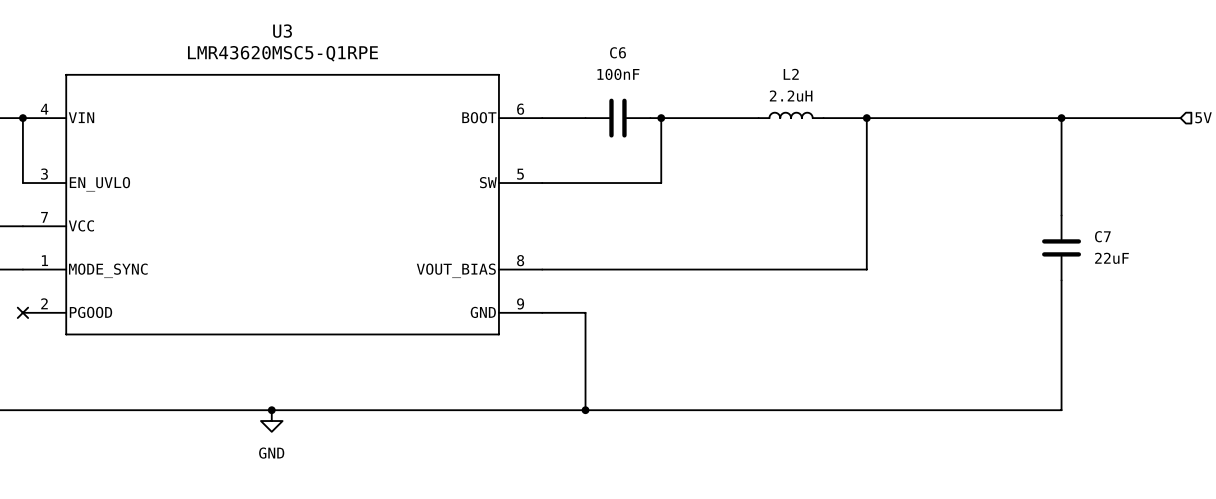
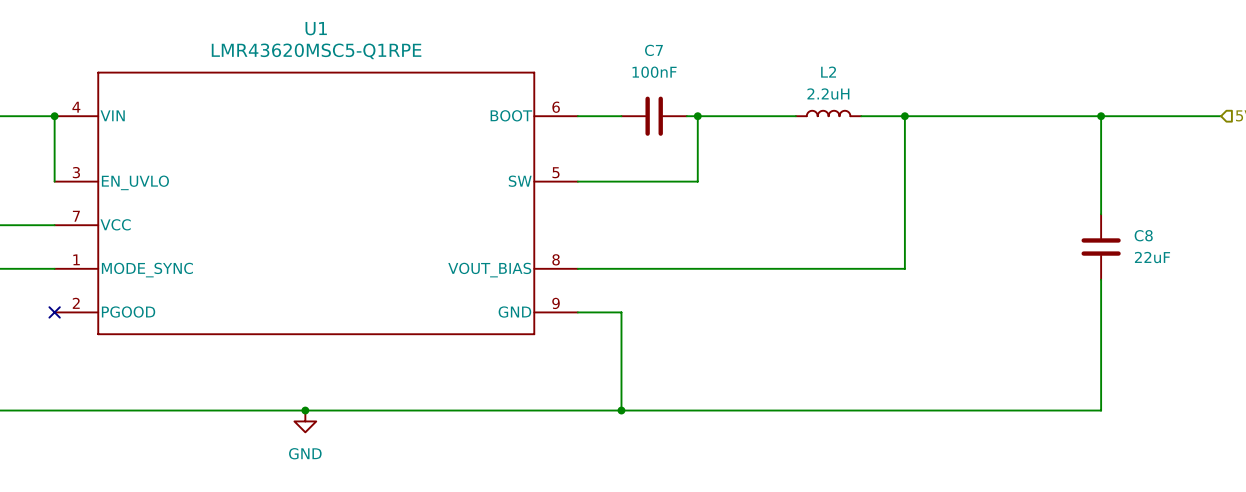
U3 name: U3 (282, 31) -> U1 (316, 28)
C6 name: C6 (617, 52) -> C7 (653, 50)
C7 name: C7 (1102, 236) -> C8 (1143, 235)

